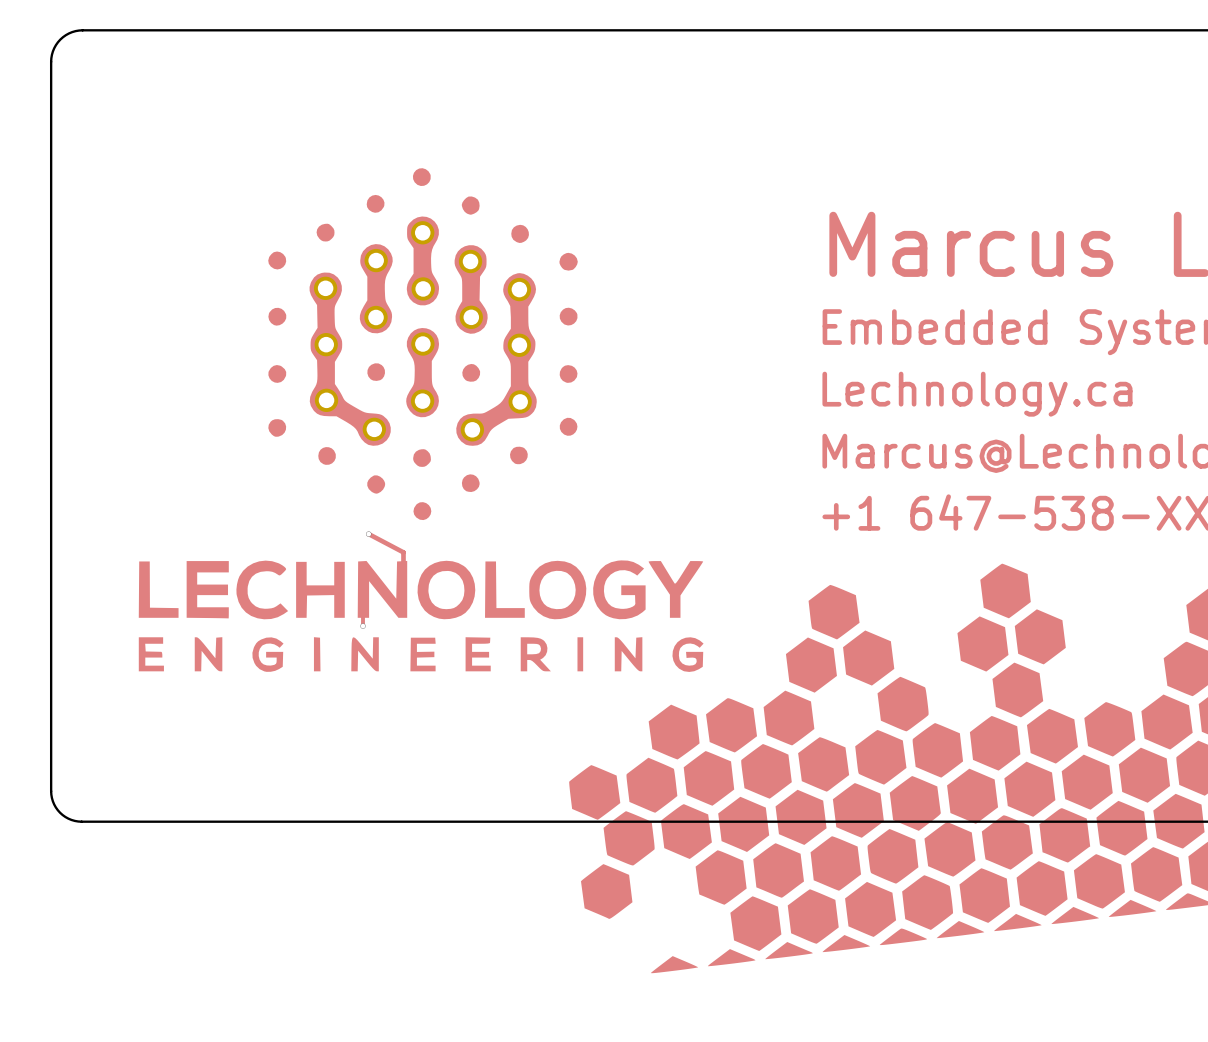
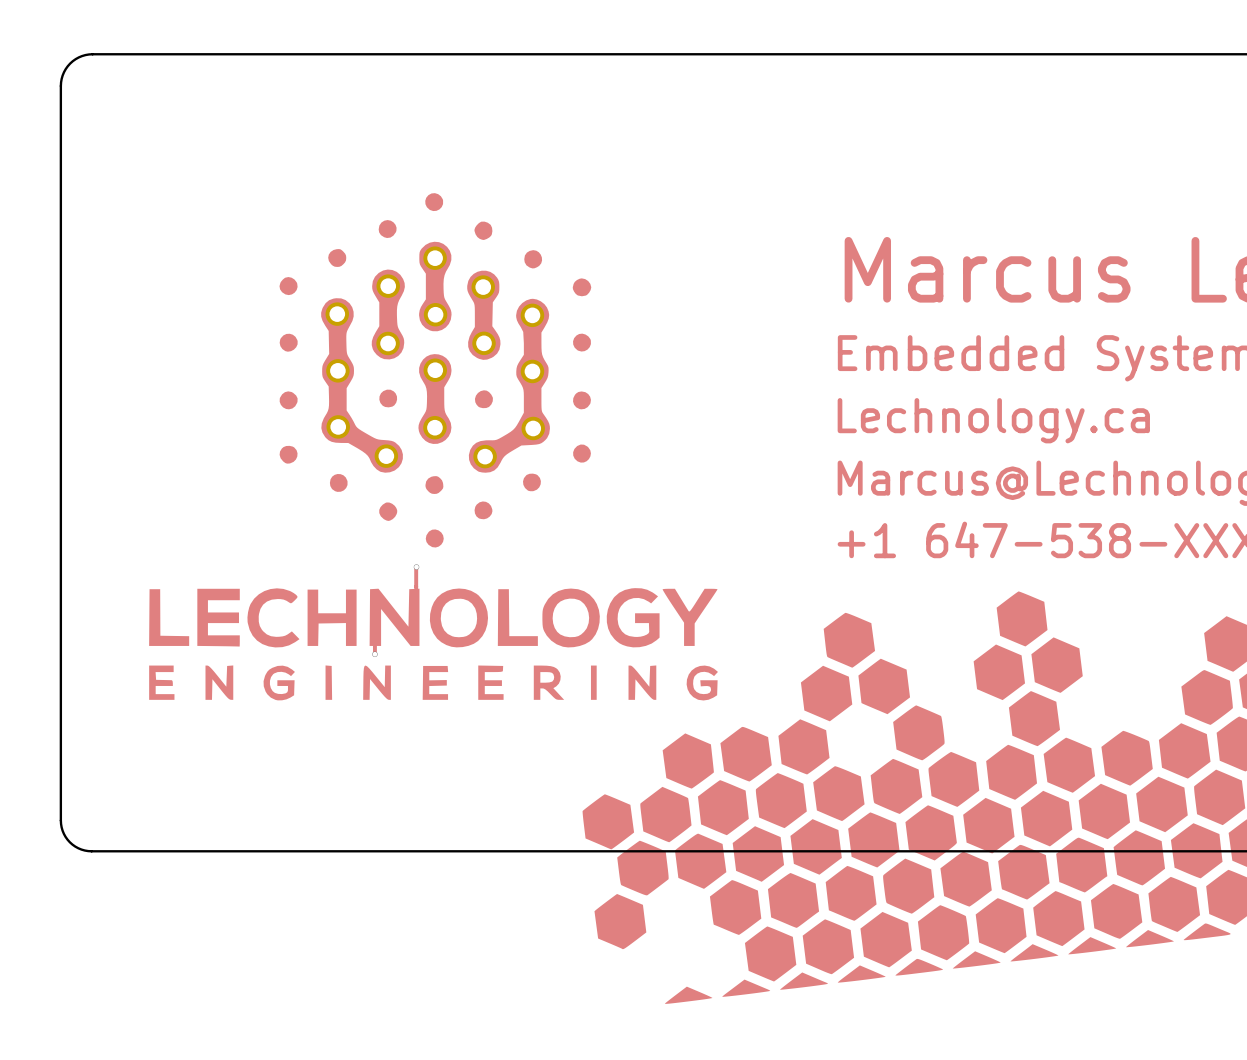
track: (368, 534) (403, 552) (403, 576) -> none
via position: (368, 534) -> (416, 567)
track: none -> (416, 567) (416, 591)

